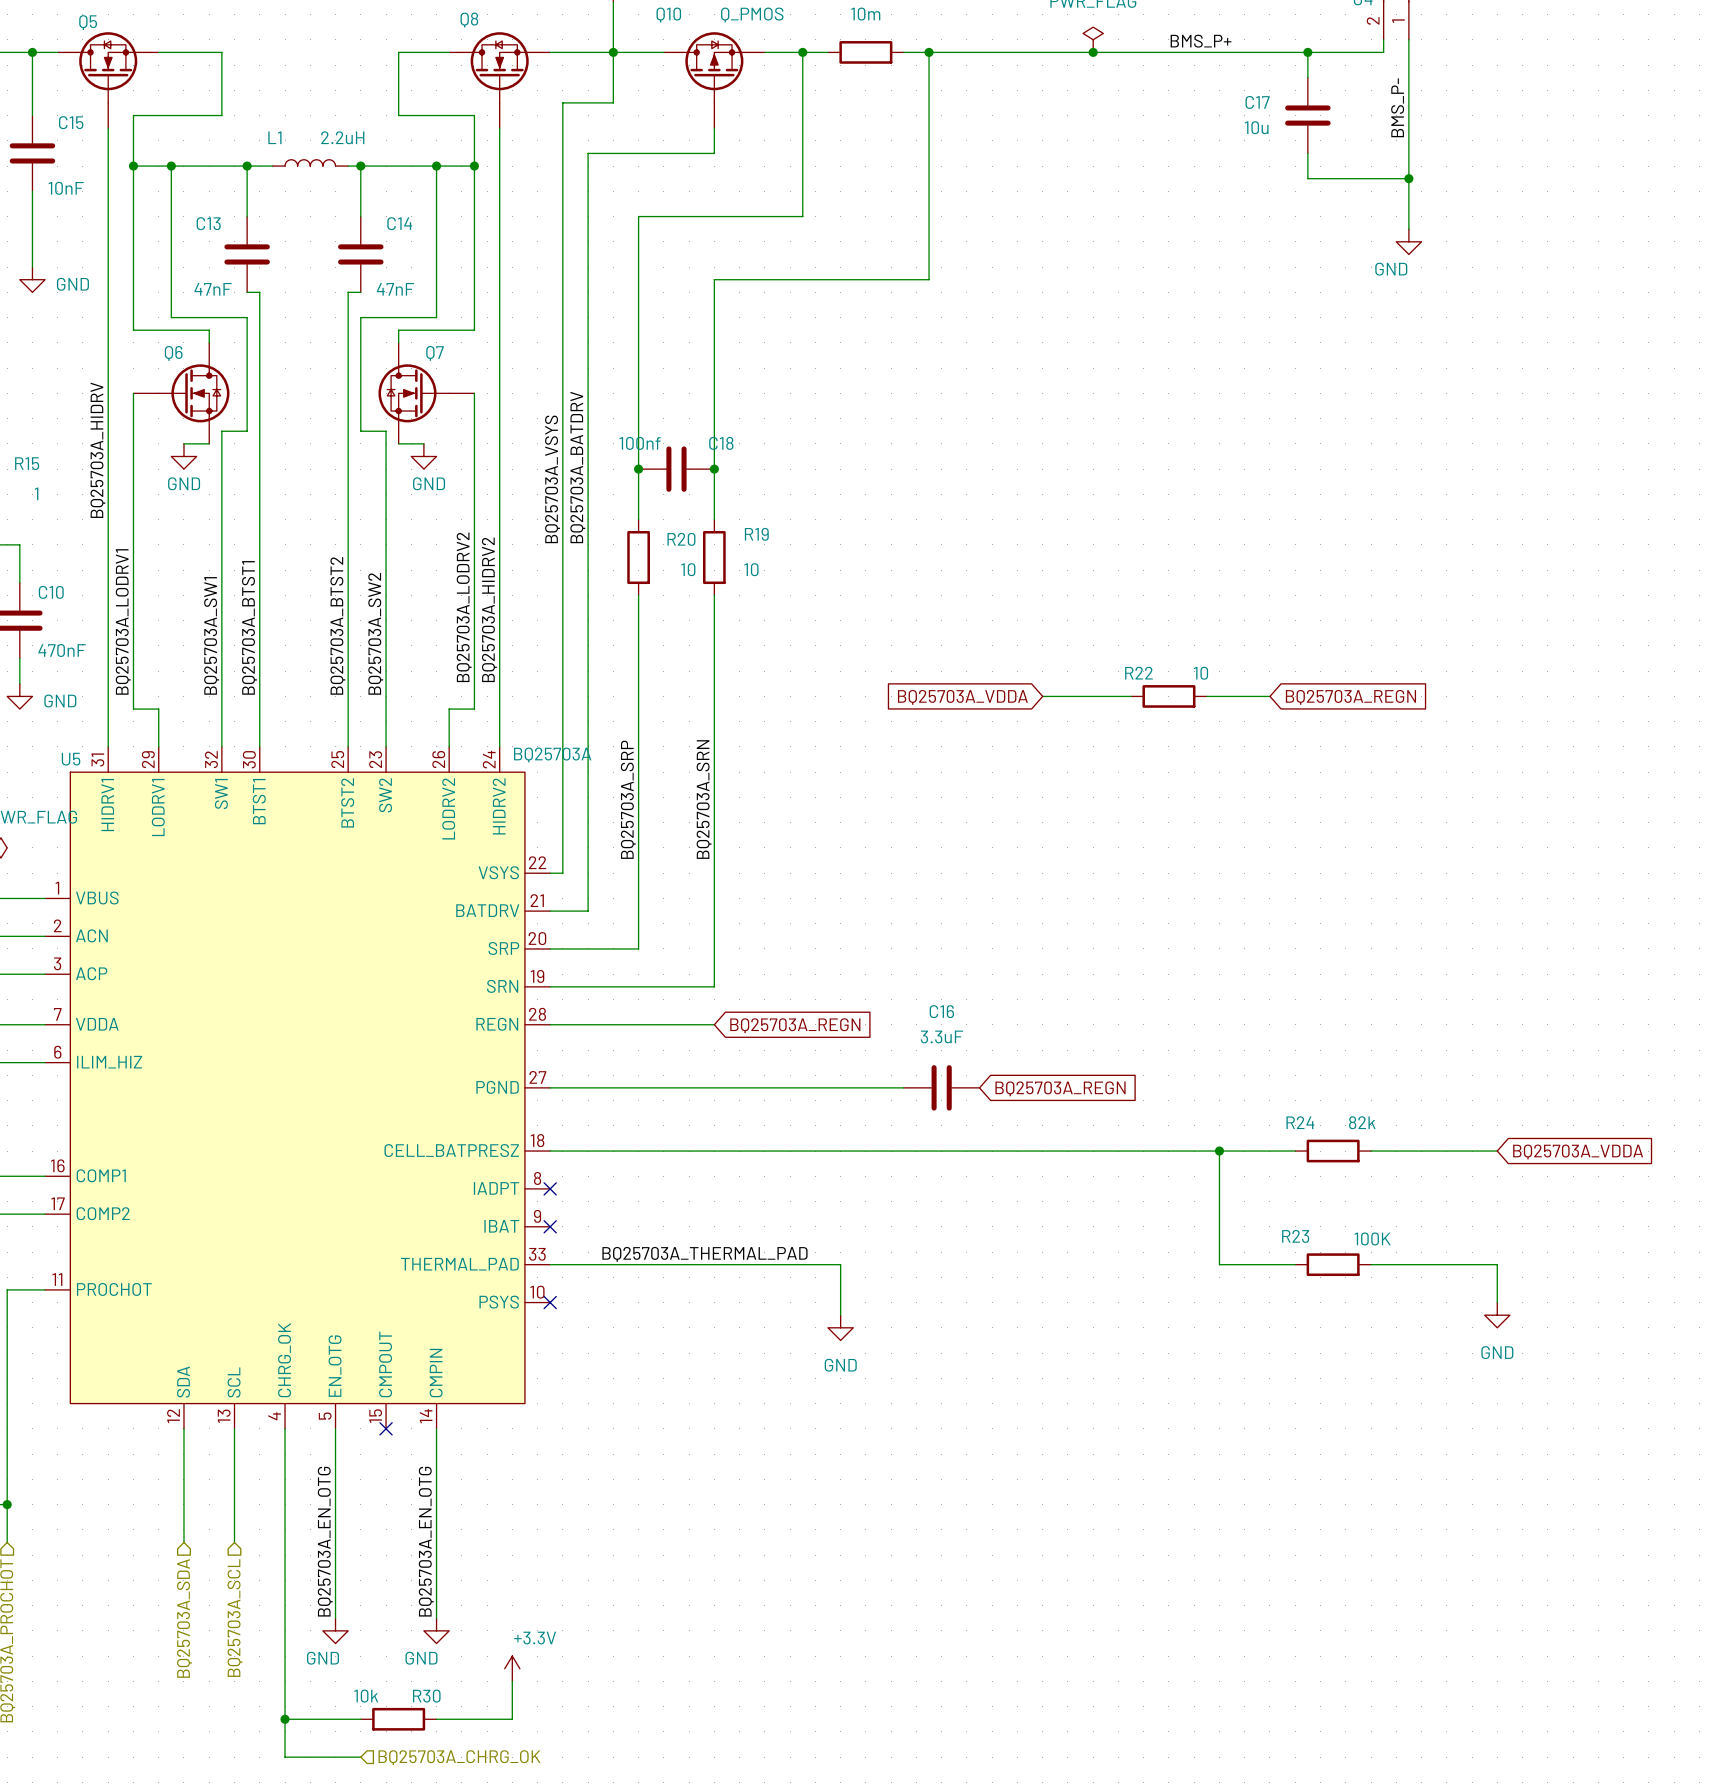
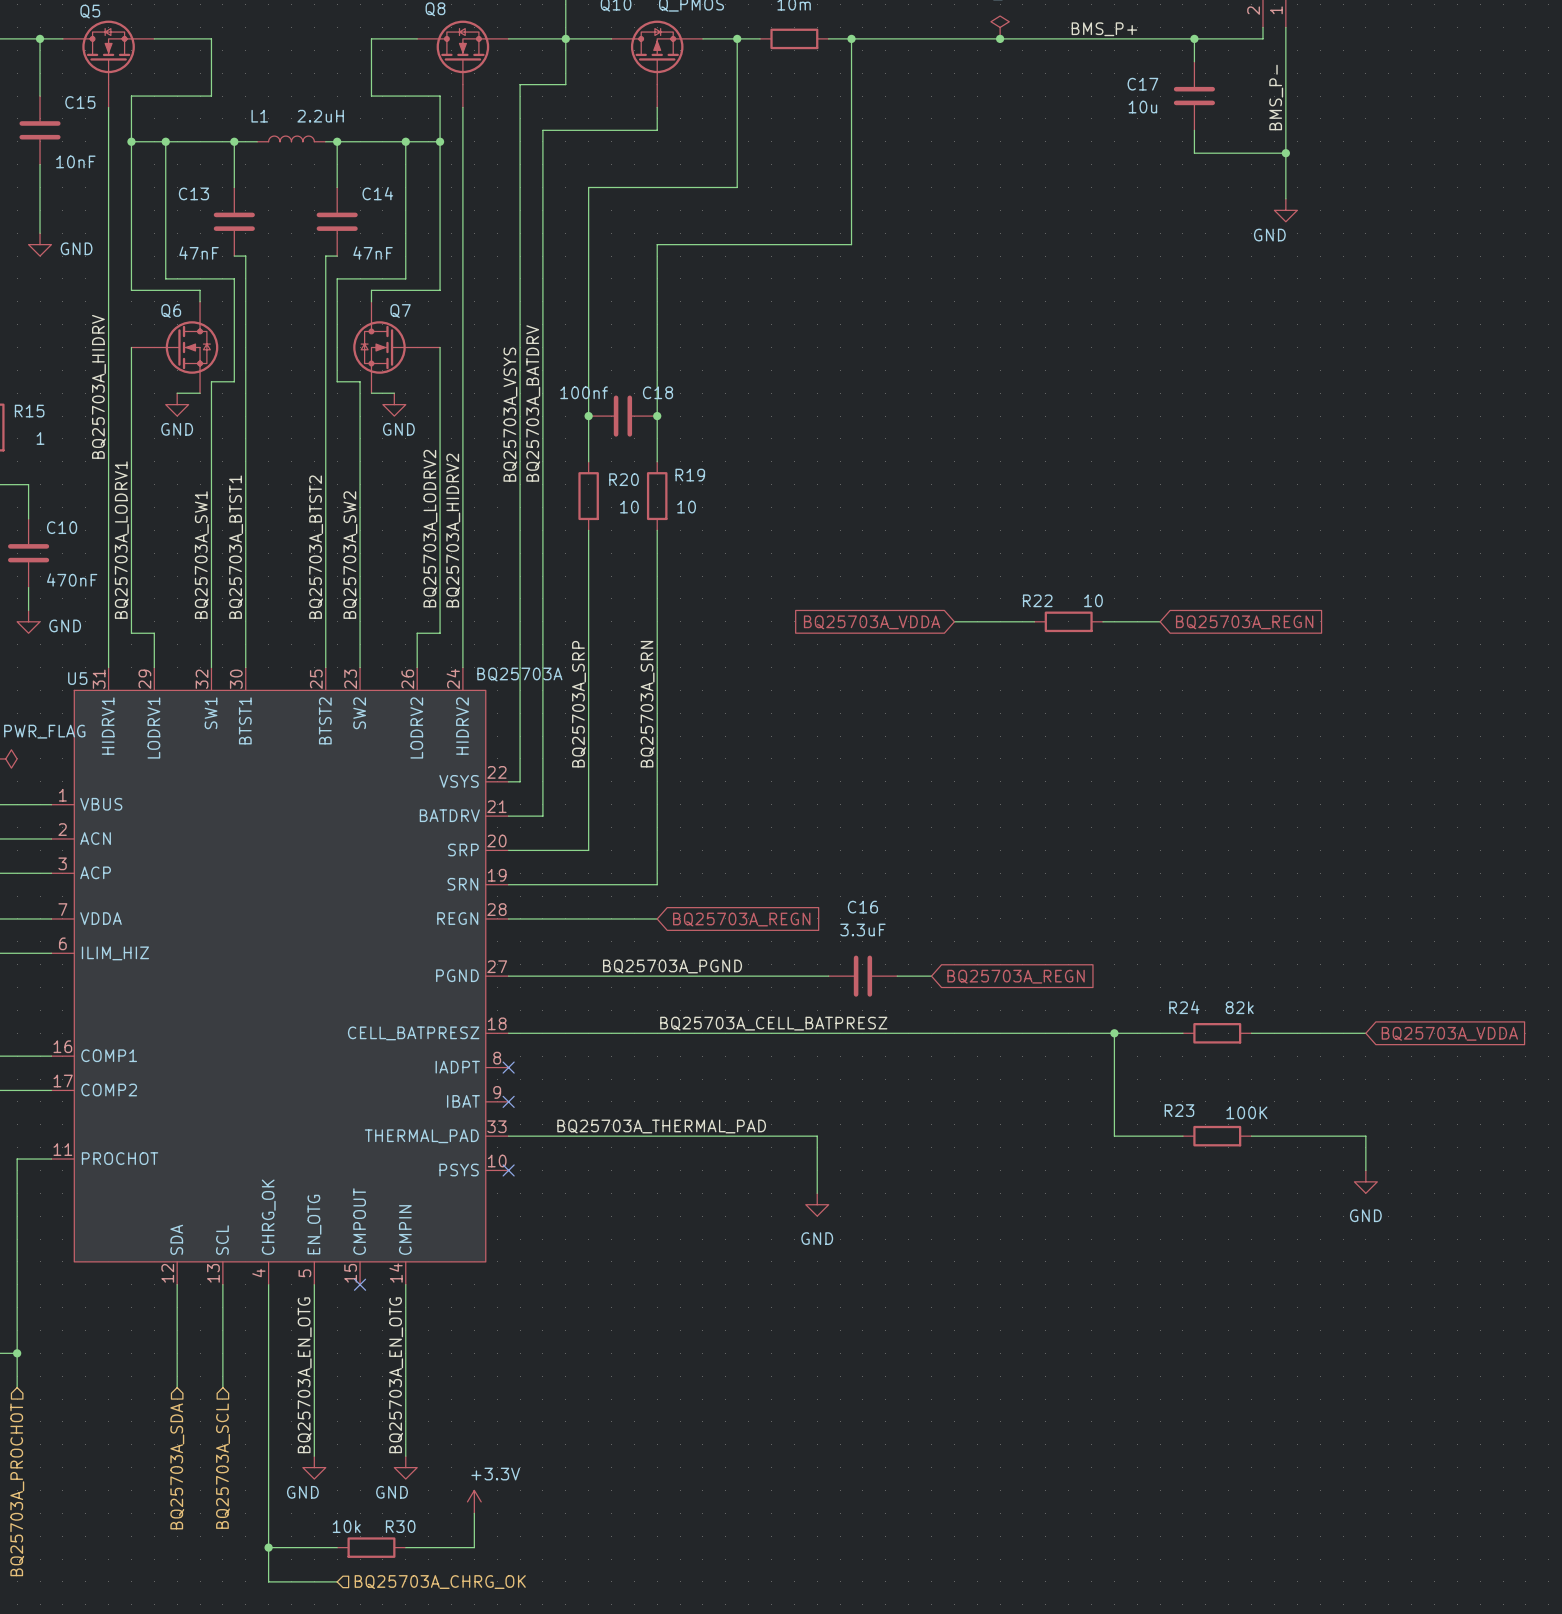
label: none -> BQ25703A_PGND (672, 966)
wire: none -> (897, 976) (931, 976)
global label position: BQ25703A_REGN (1060, 1088) -> BQ25703A_REGN (1016, 976)
label: none -> BQ25703A_CELL_BATPRESZ (773, 1023)
wire: (840, 1264) (840, 1315) -> (771, 1136) (817, 1136) (817, 1193)
power symbol position: GND (840, 1327) -> GND (817, 1204)

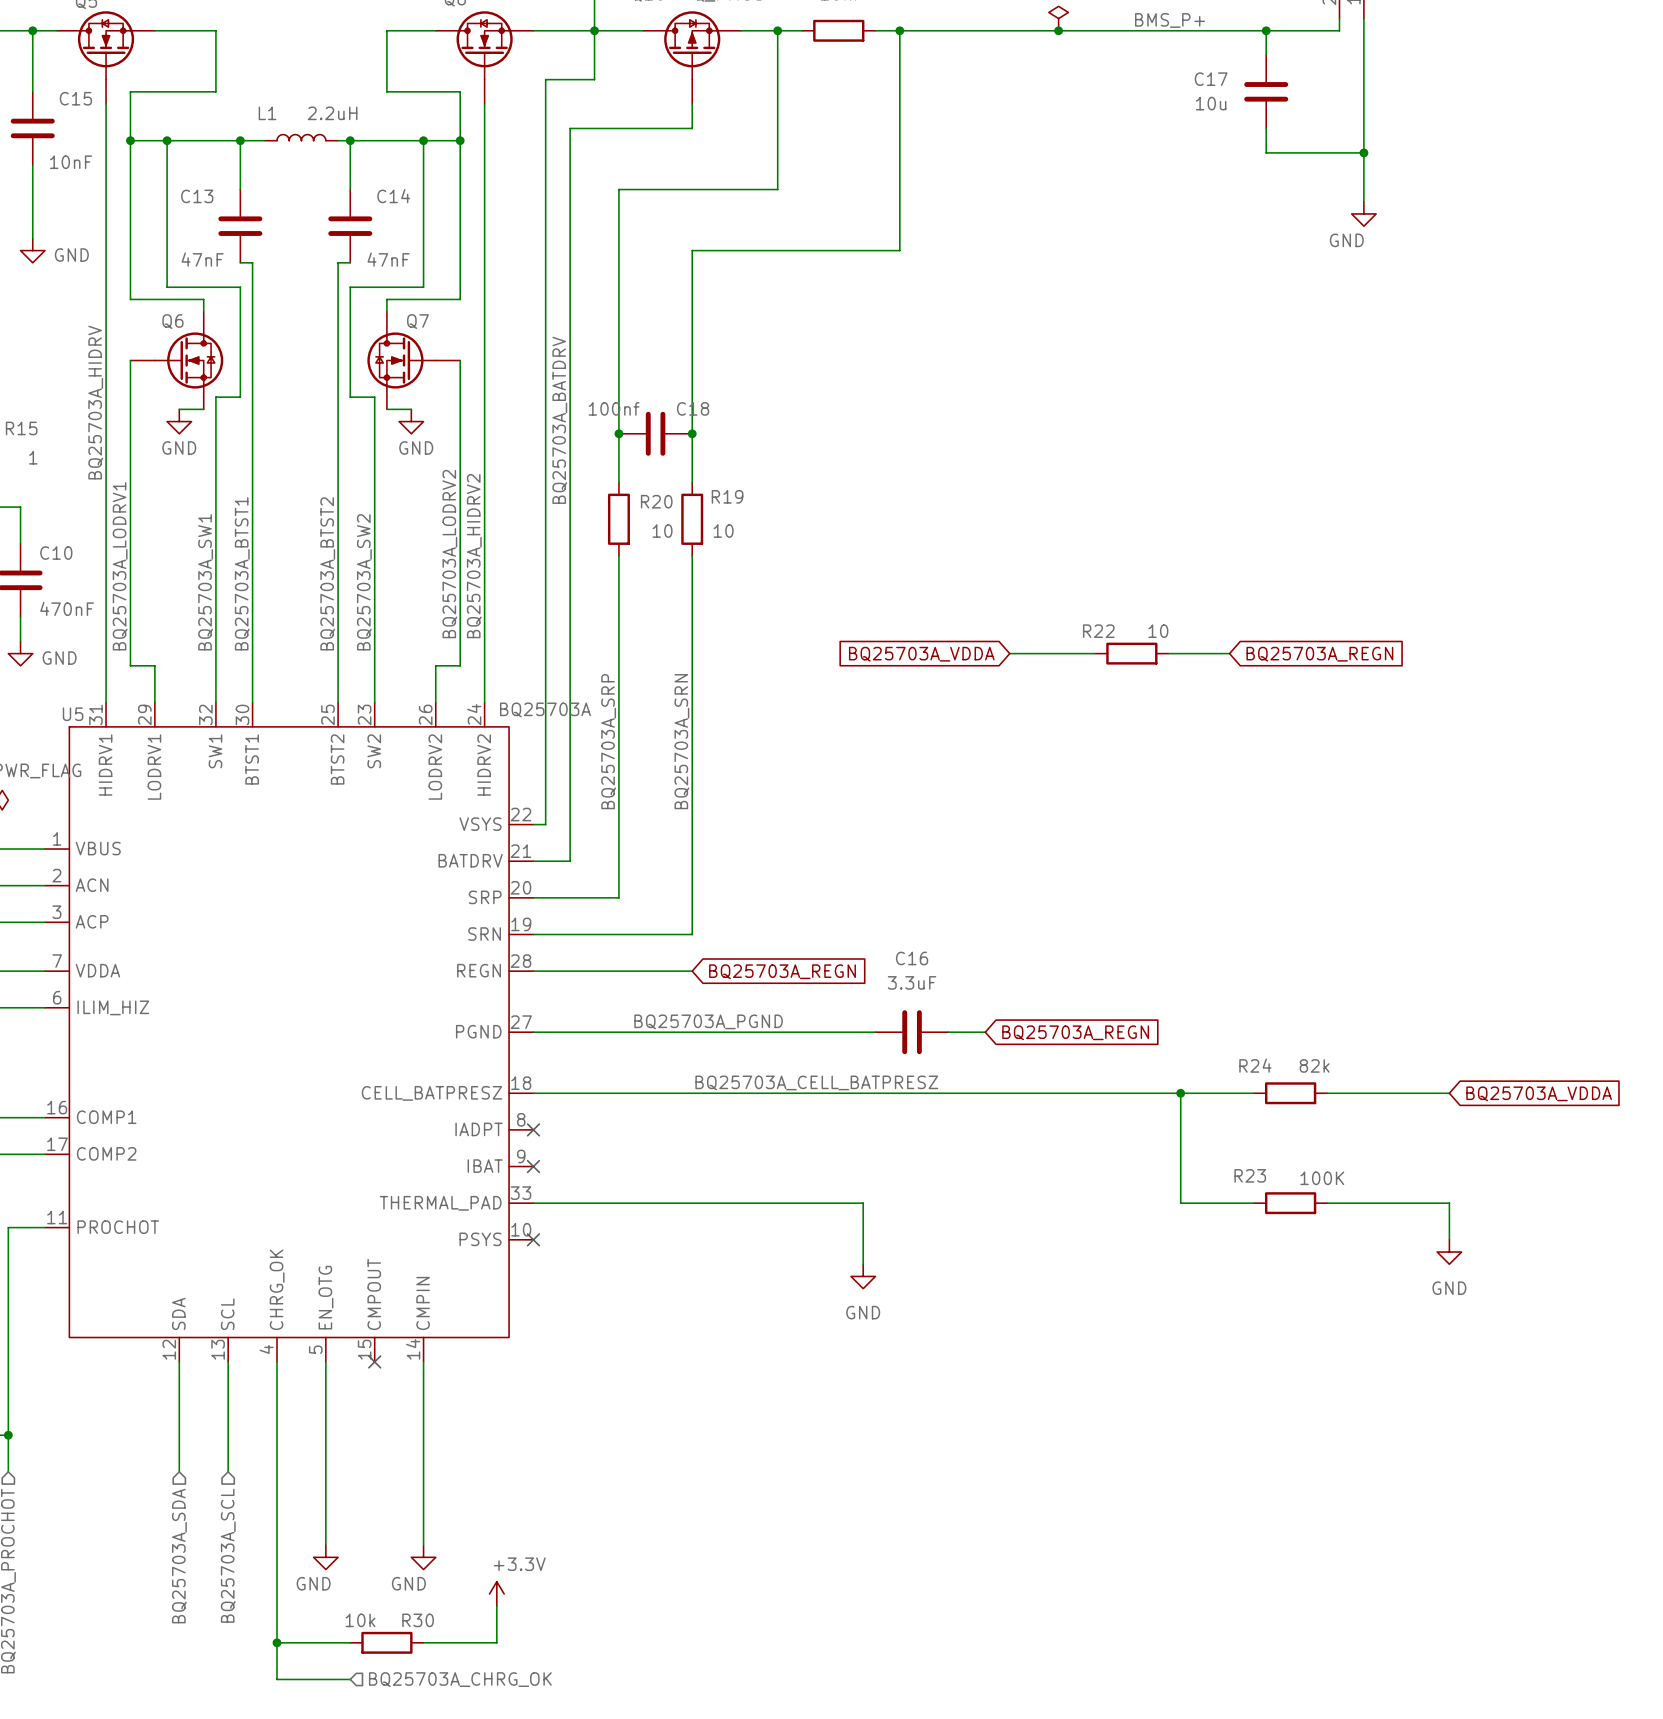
label: BMS_P- (1276, 97) -> none
label: BQ25703A_VSYS (510, 414) -> none
label: BQ25703A_THERMAL_PAD (661, 1126) -> none
label: BQ25703A_EN_OTG (304, 1375) -> none
label: BQ25703A_EN_OTG (396, 1375) -> none

